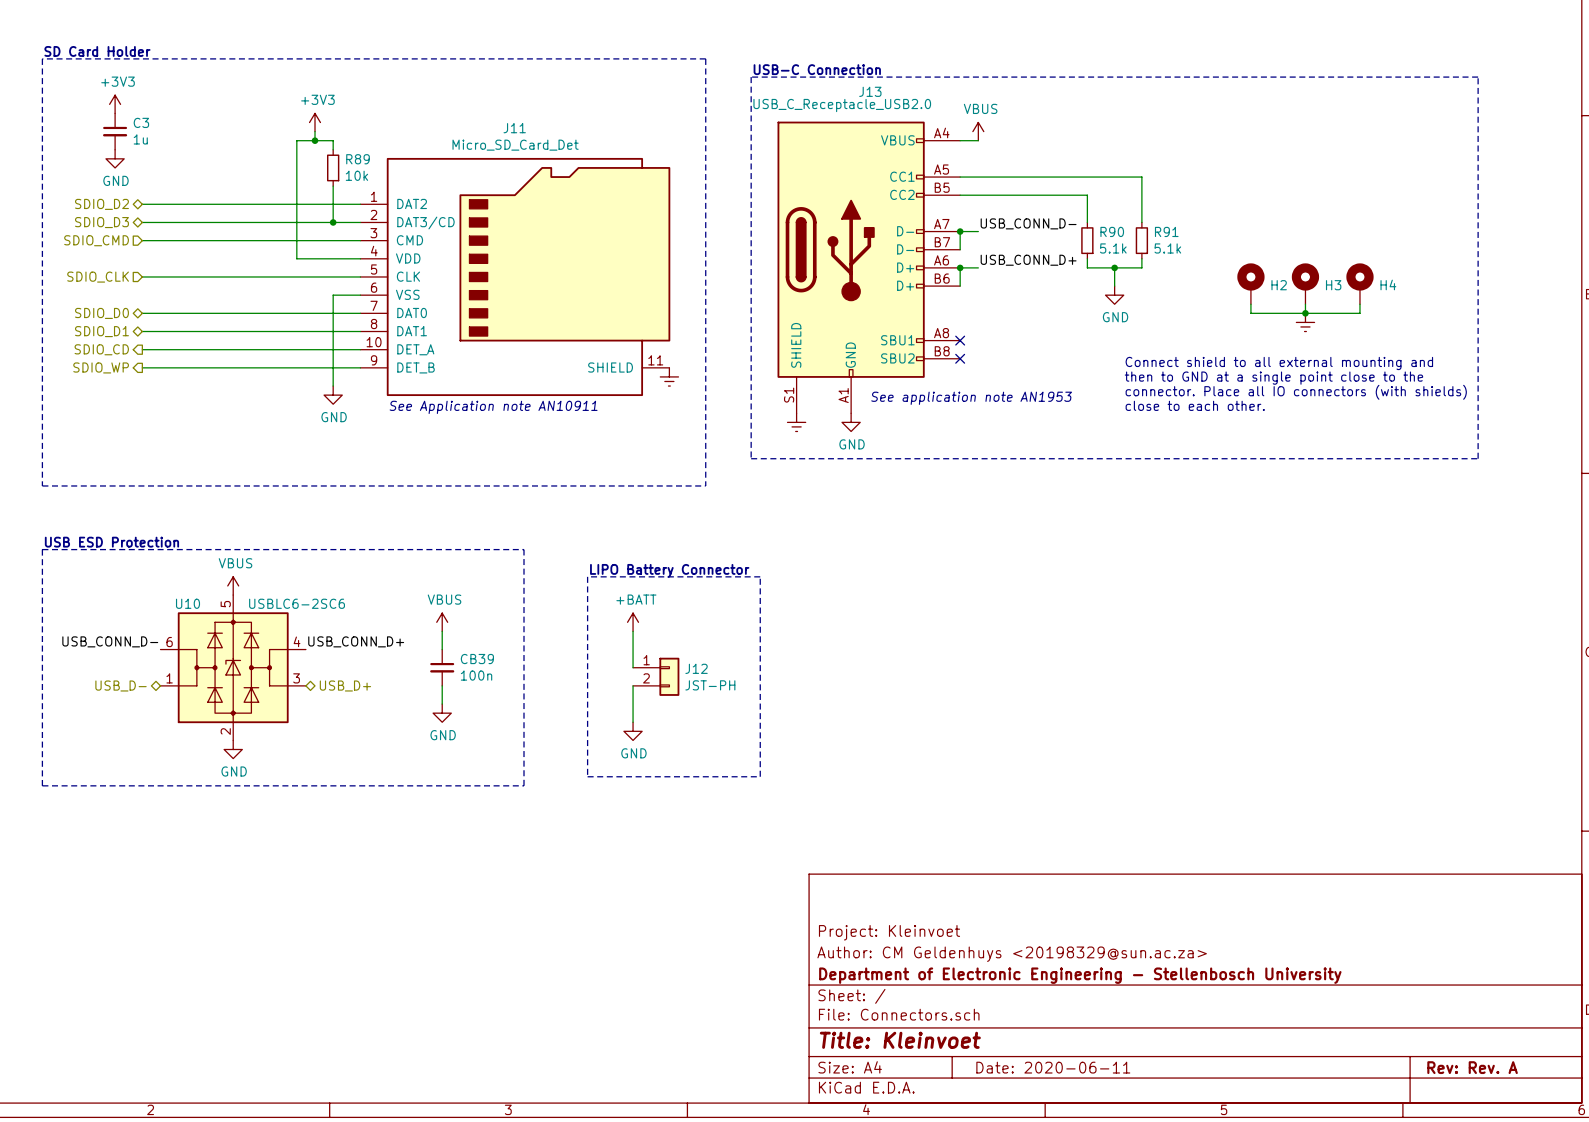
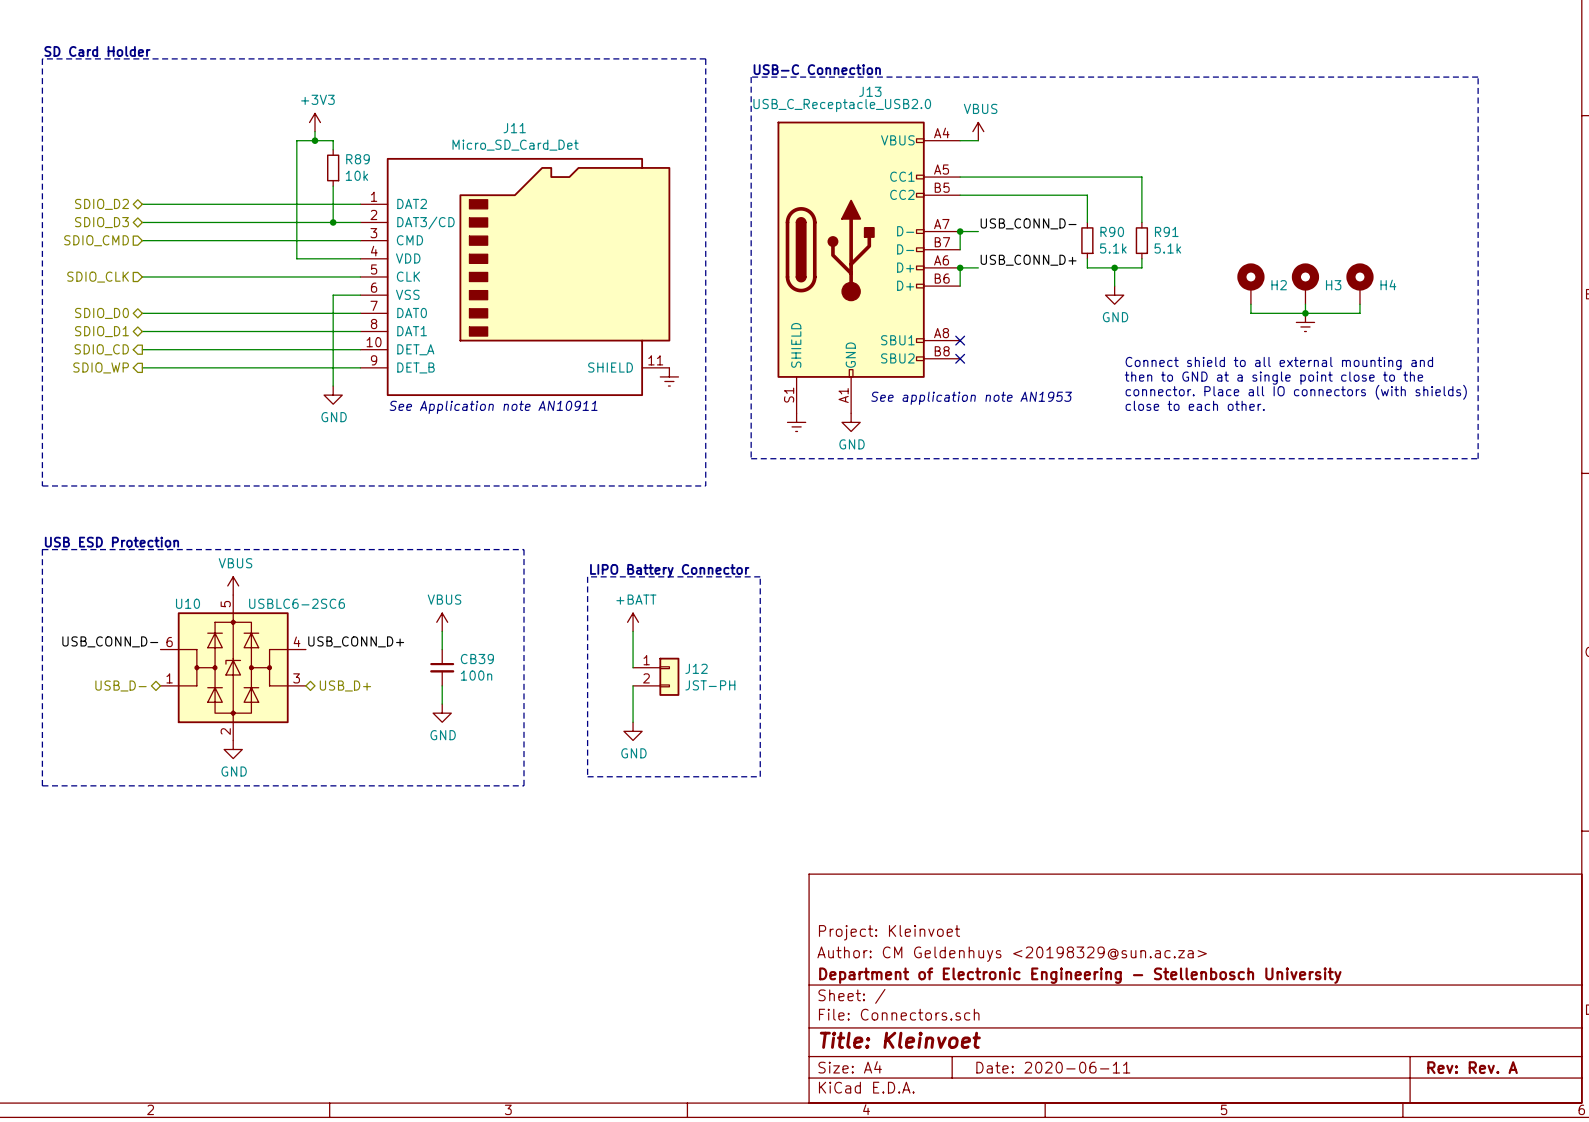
power symbol: +3V3 (115, 104) -> none
C3: 1u (115, 131) -> none
power symbol: GND (115, 158) -> none

